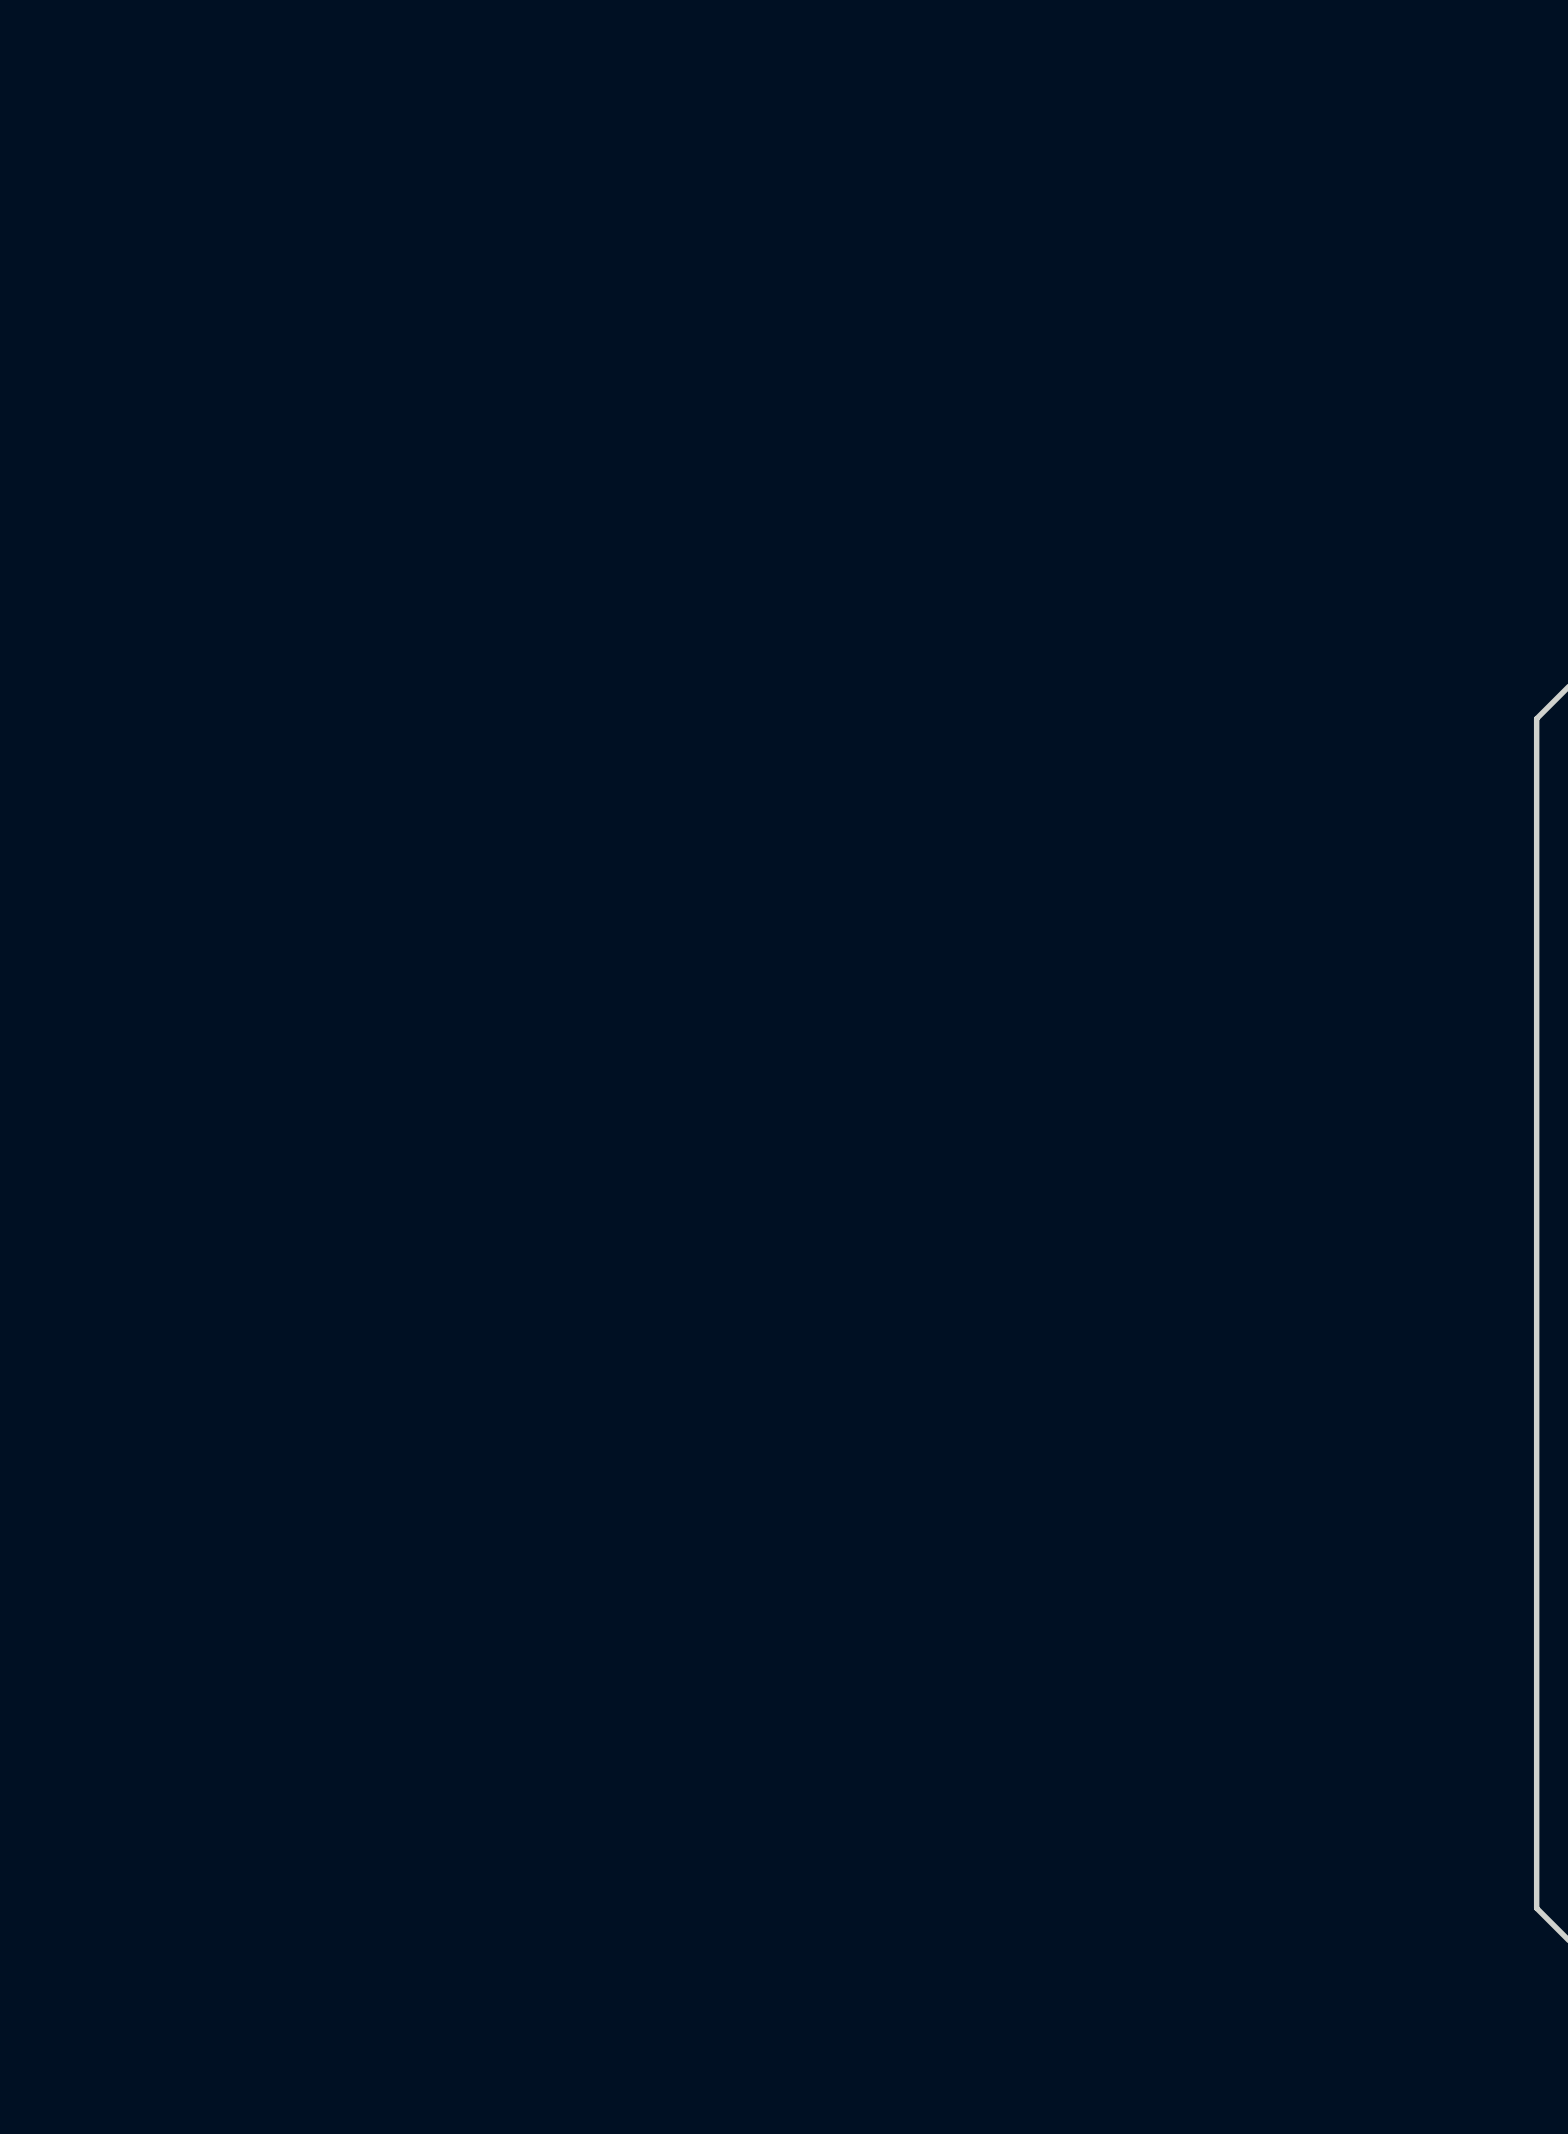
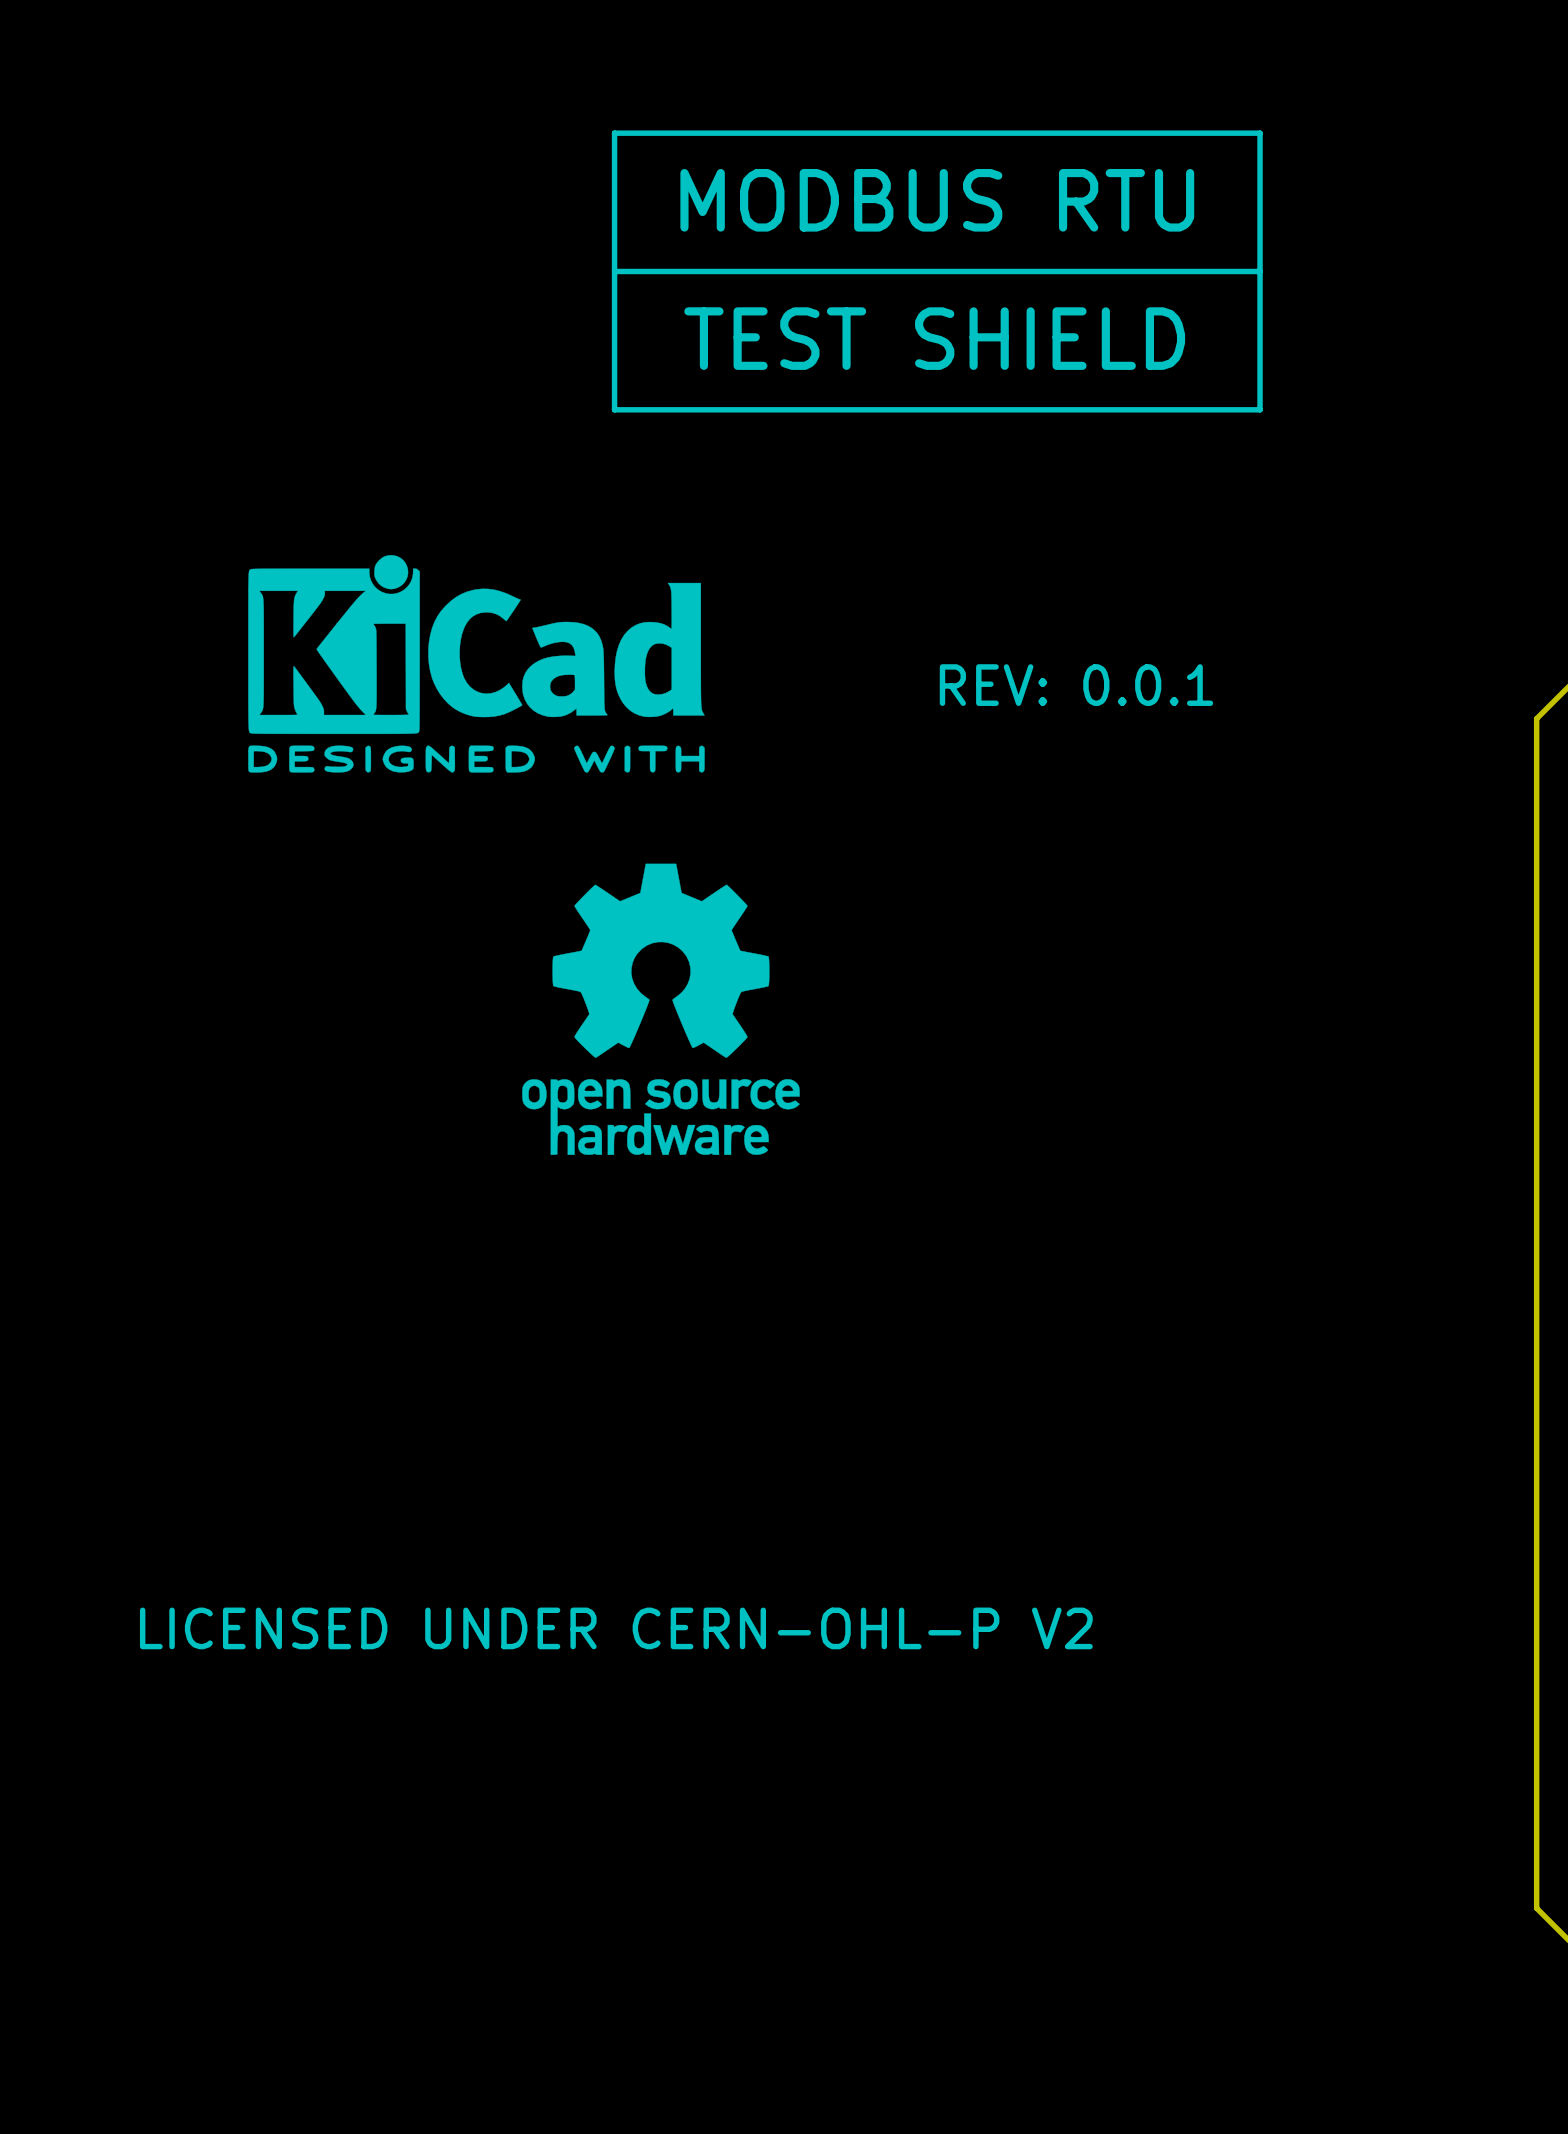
line: none -> (1260, 133) (614, 133) (614, 409) (1260, 409) (1260, 133)
text: none -> MODBUS RTU (937, 200)
line: none -> (1260, 271) (614, 271)
text: none -> TEST SHIELD (934, 338)
drawing: none -> [248, 555, 705, 773]
text: none -> REV: 0.0.1 (1076, 685)
drawing: none -> [522, 863, 800, 1156]
text: none -> LICENSED UNDER CERN-OHL-P V2 (616, 1628)

